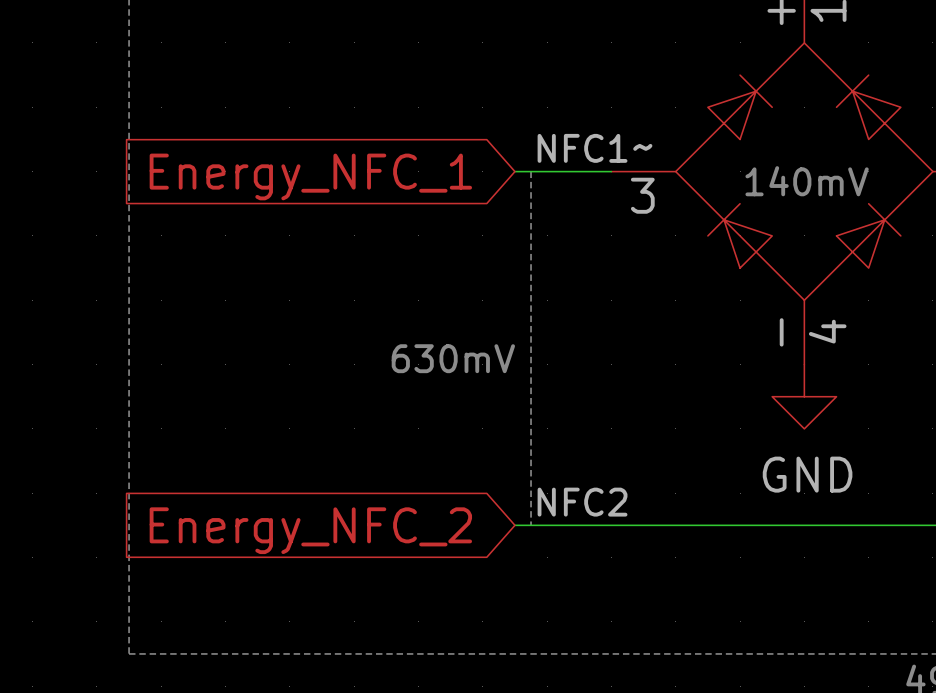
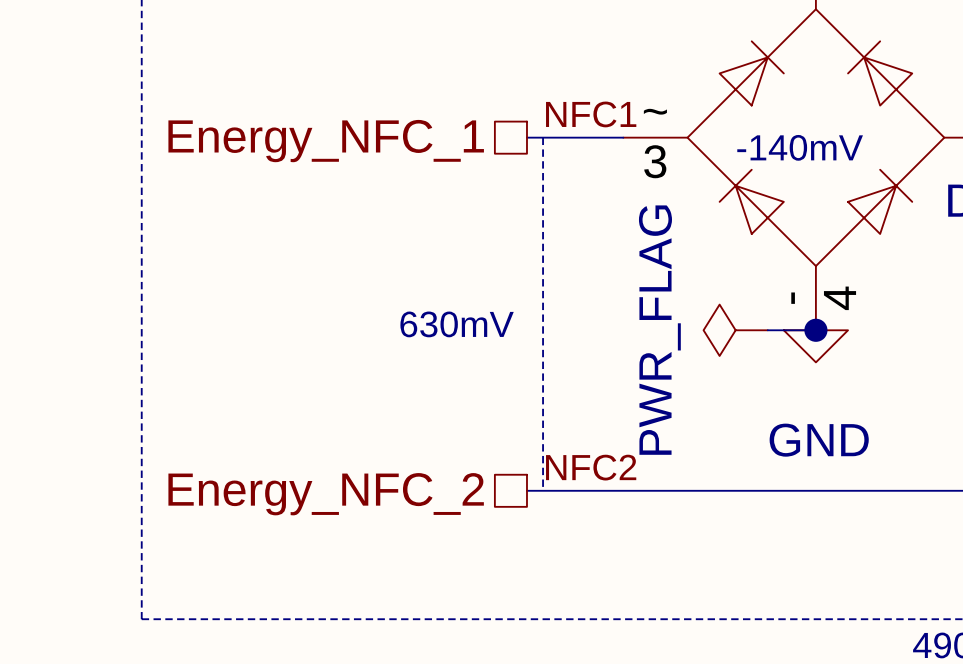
hierarchical label: none -> Energy_NFC_1 (326, 141)
global label: Energy_NFC_1 (310, 176) -> none
text: 140mV (807, 181) -> -140mV (800, 147)
power symbol: none -> PWR_FLAG (735, 330)
wire: none -> (767, 330) (815, 330)
power symbol shape: [772, 364, 837, 429] -> [783, 330, 849, 363]
junction: none -> (815, 330)
hierarchical label: none -> Energy_NFC_2 (326, 494)
global label: Energy_NFC_2 (310, 530) -> none

